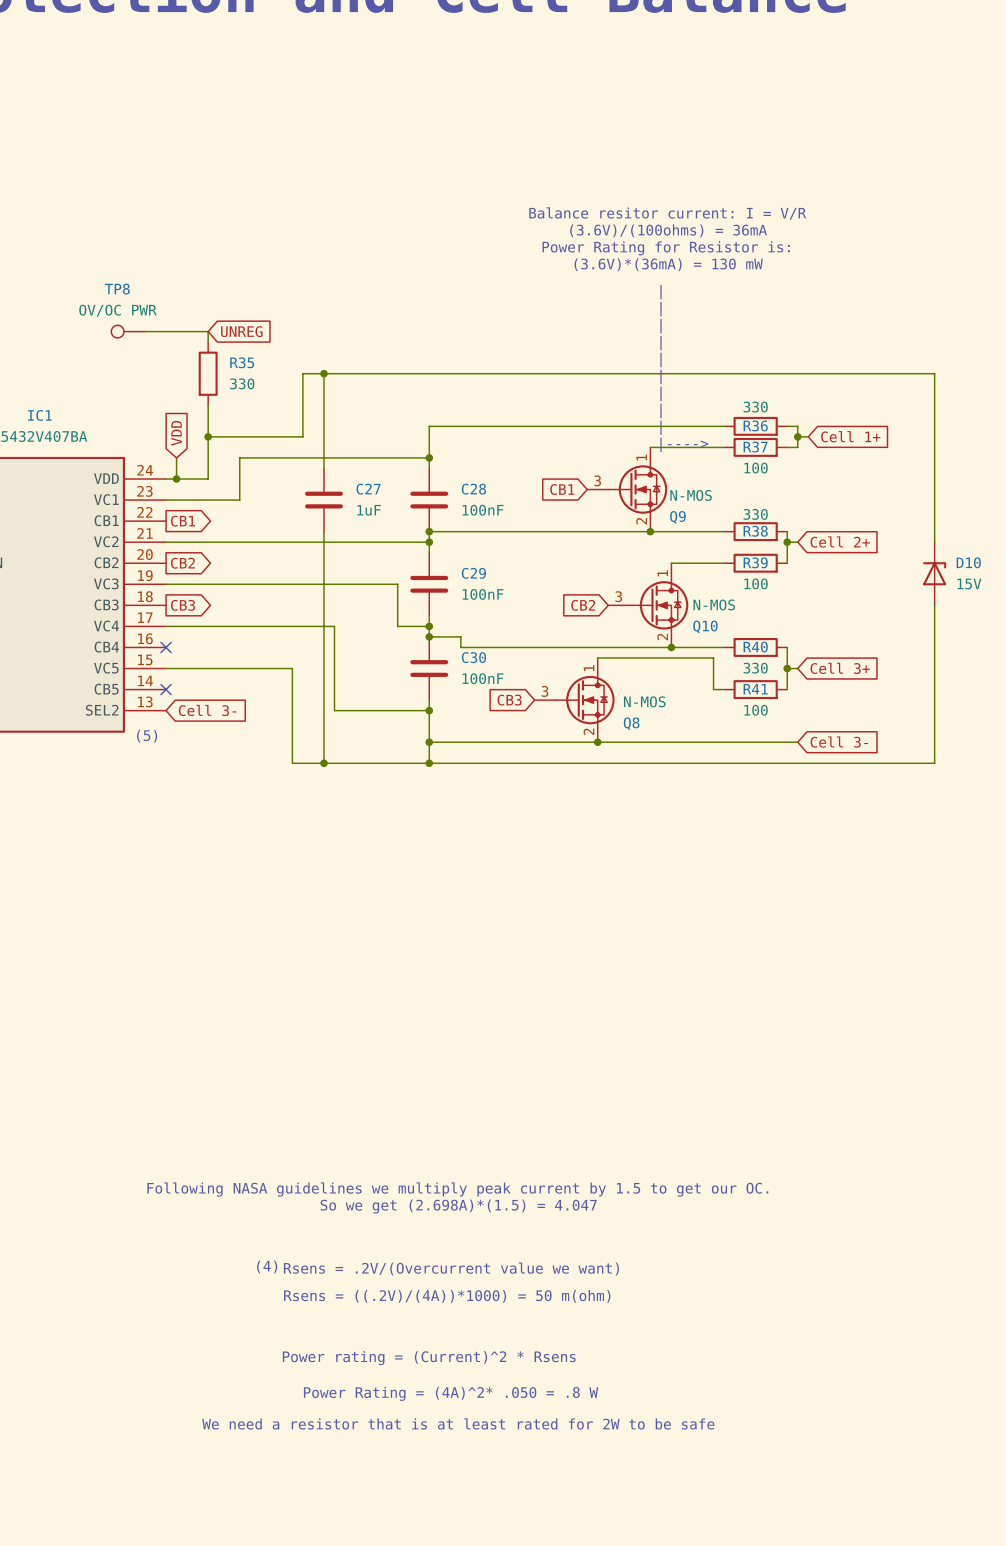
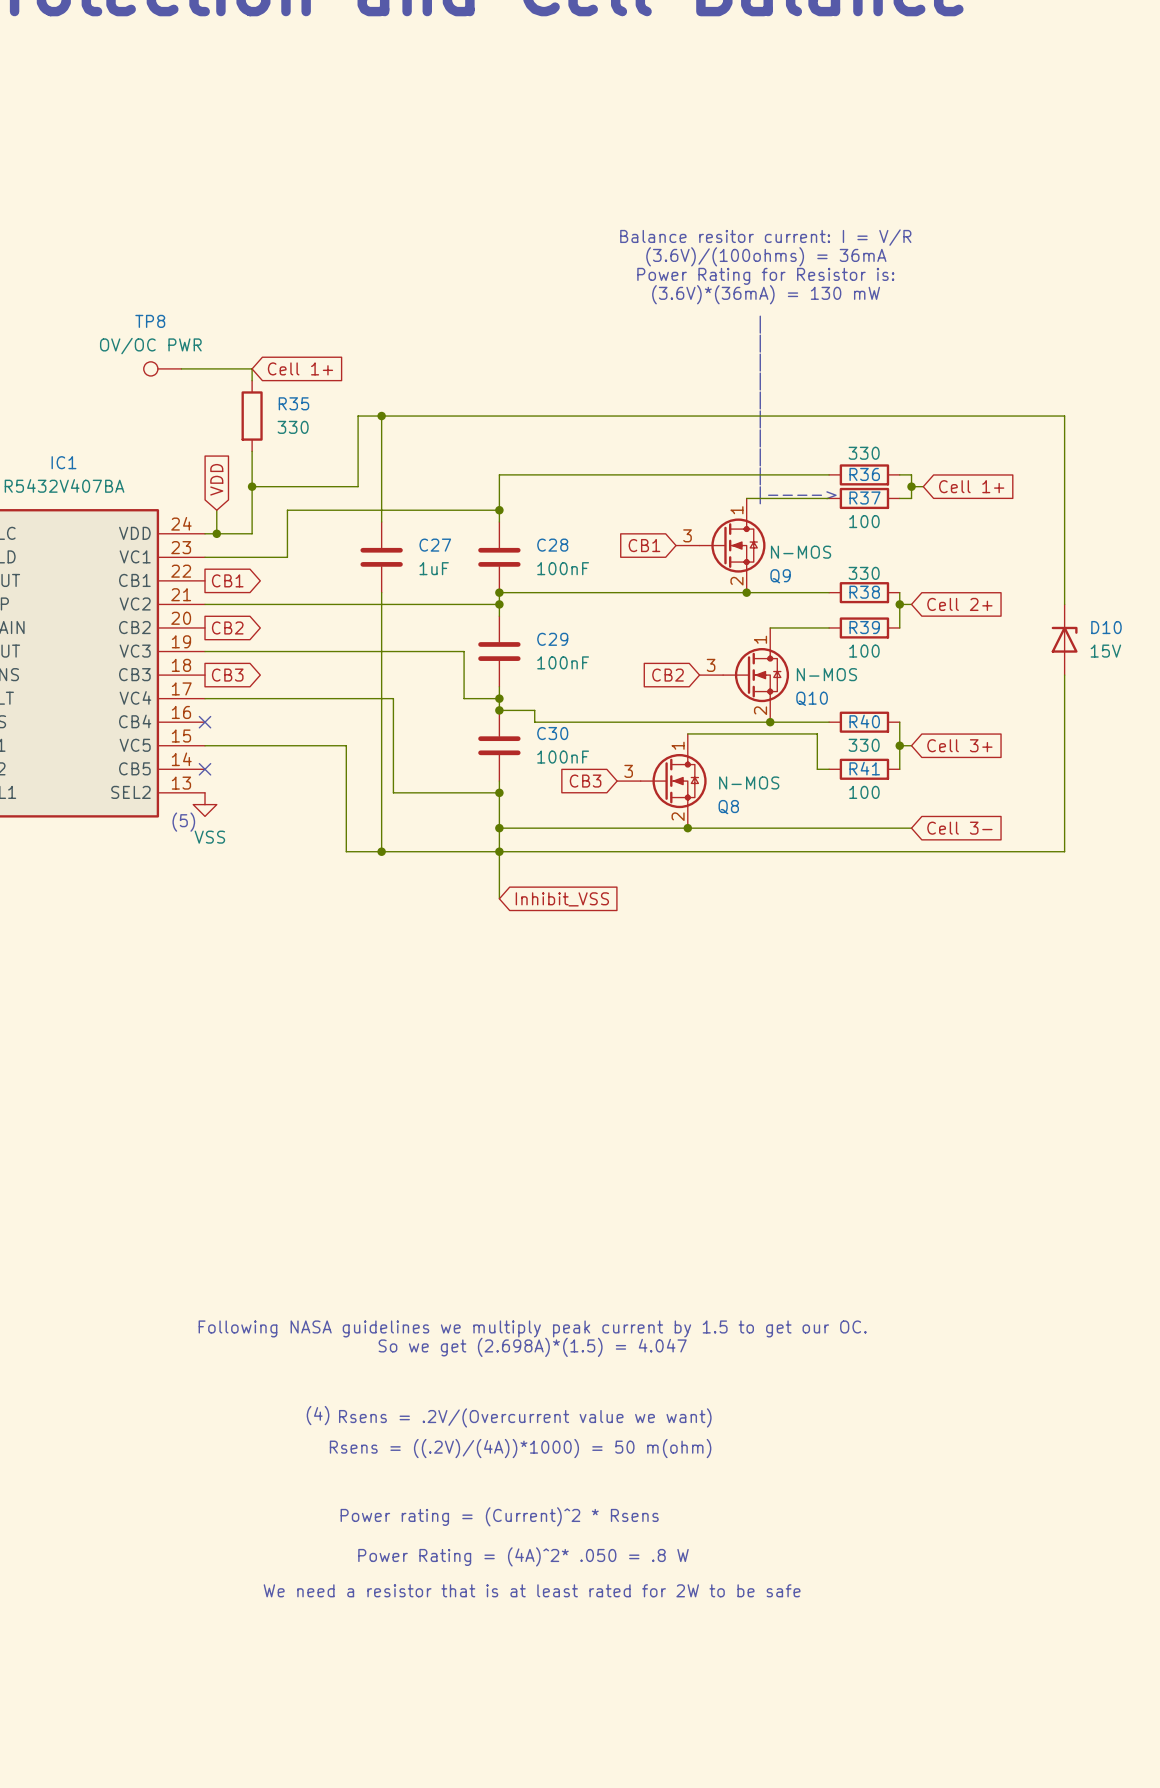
global label: UNREG (241, 331) -> Cell 1+ (300, 368)
global label: Cell 3- (207, 710) -> none
power symbol: none -> VSS (205, 804)
wire: none -> (499, 851) (499, 898)
global label: none -> Inhibit_VSS (562, 899)

